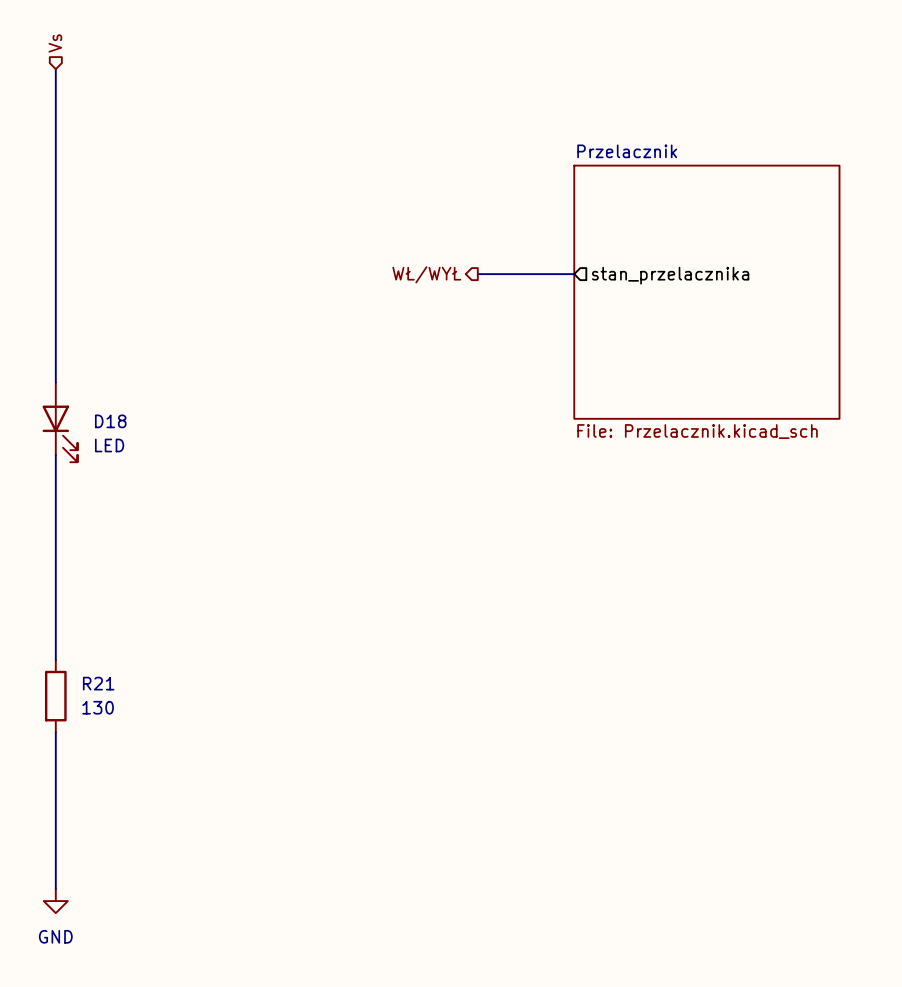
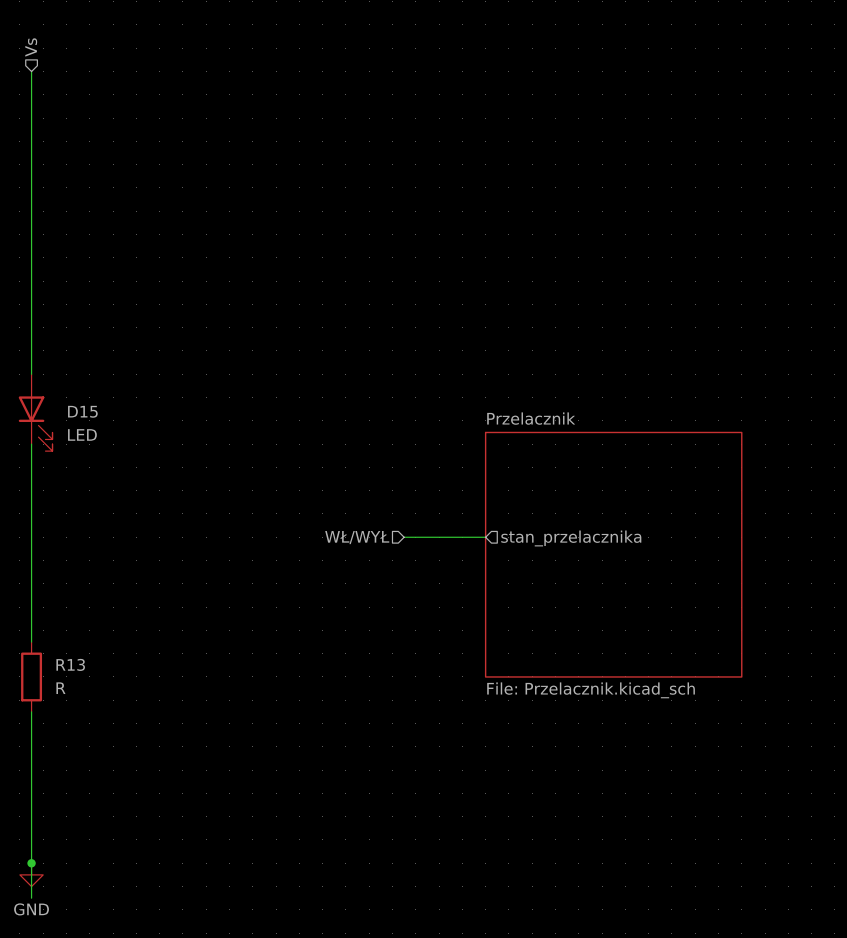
hierarchical label: WŁ/WYŁ (426, 274) -> none
wire: (477, 274) (574, 274) -> none
sheet pin: stan_przelacznika (670, 275) -> none
sheet Przelacznik: File: Przelacznik.kicad_sch (706, 292) -> none
D18 name: D18 (110, 421) -> D15 (82, 411)
wire: none -> (404, 537) (485, 537)
hierarchical label: none -> WŁ/WYŁ (357, 537)
sheet pin: none -> stan_przelacznika (571, 538)
sheet Przelacznik: none -> File: Przelacznik.kicad_sch (613, 554)
R21 name: R21 (98, 683) -> R13 (70, 664)
R21 value: 130 (98, 707) -> R (60, 688)
wire: none -> (31, 863) (31, 898)
junction: none -> (31, 863)

